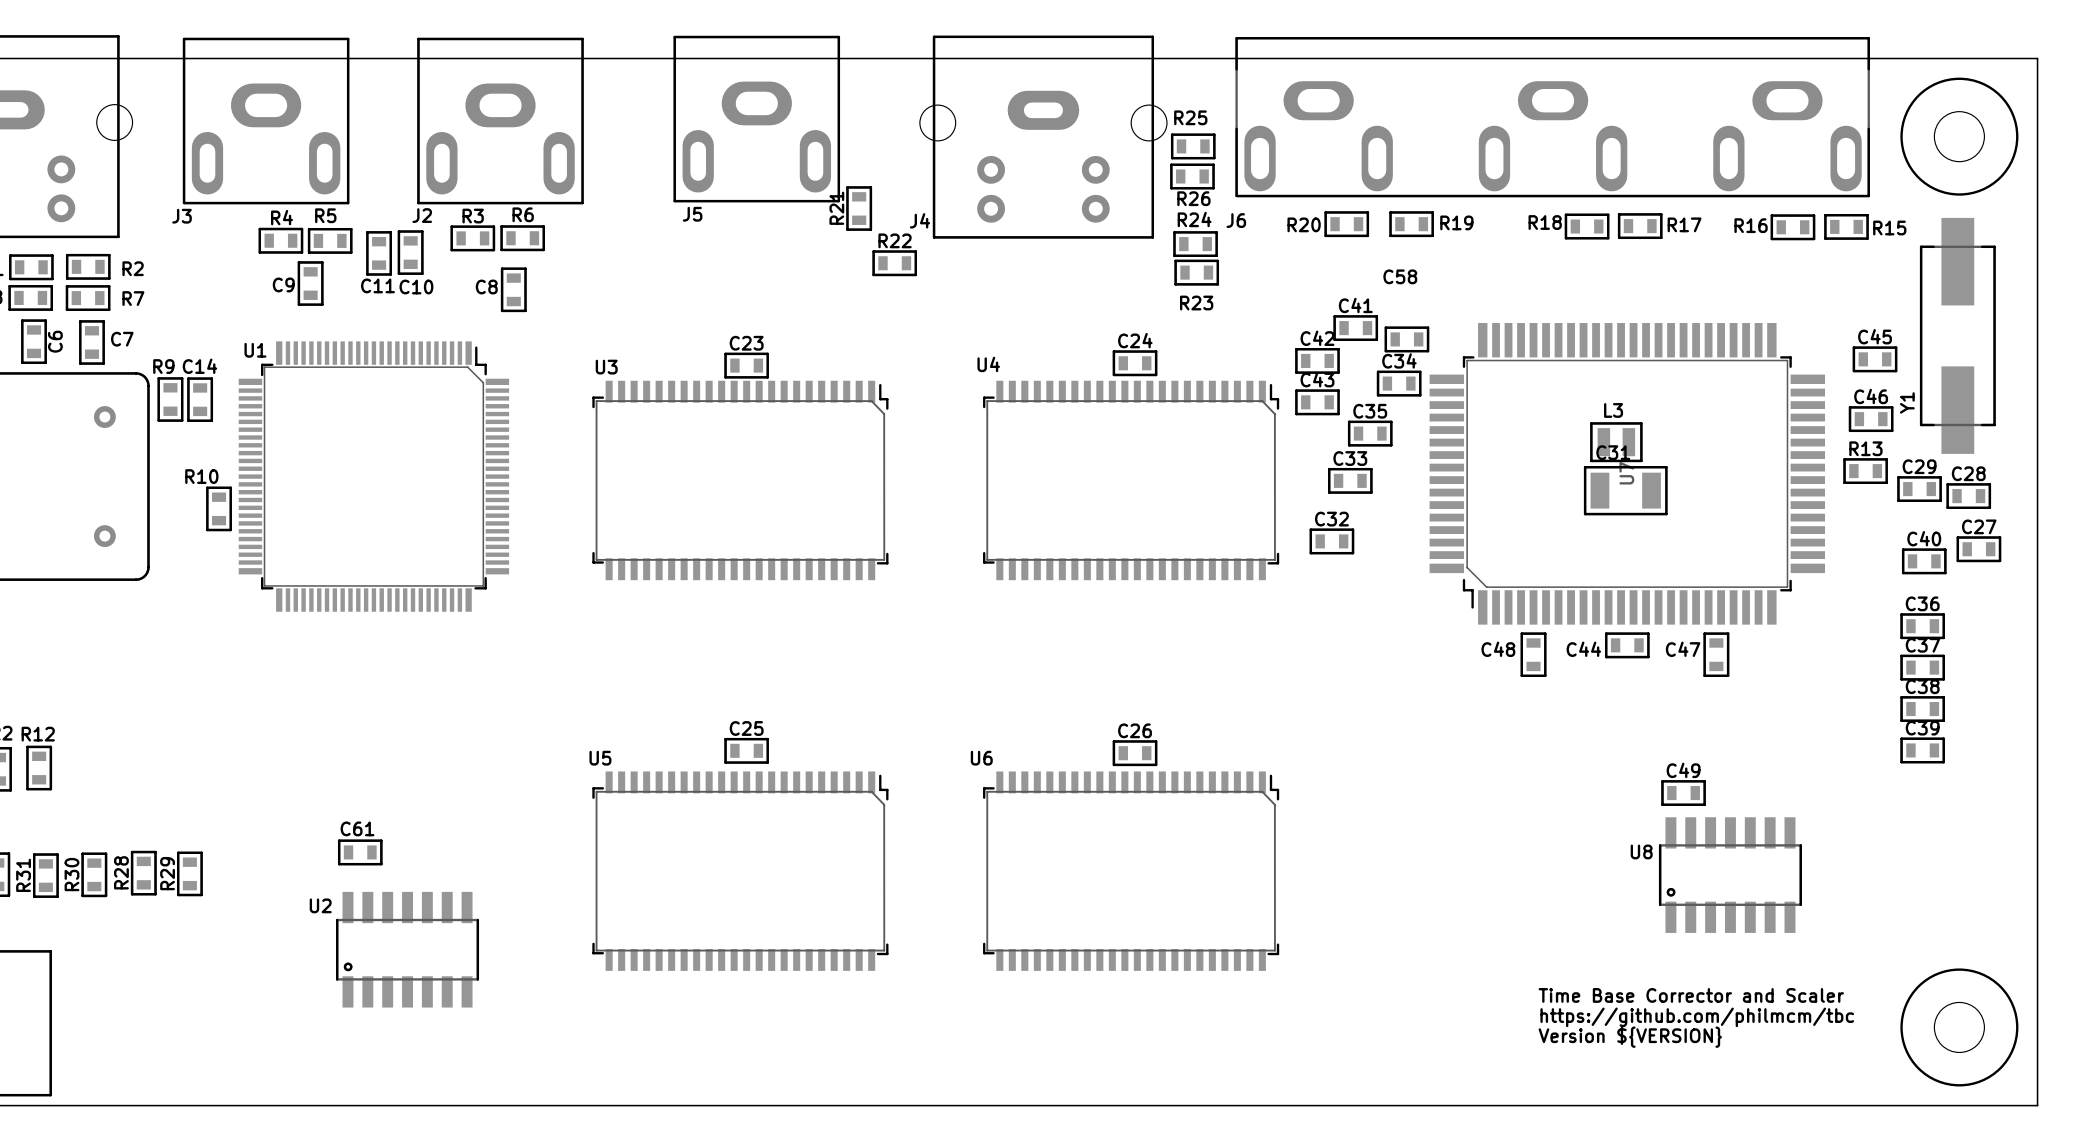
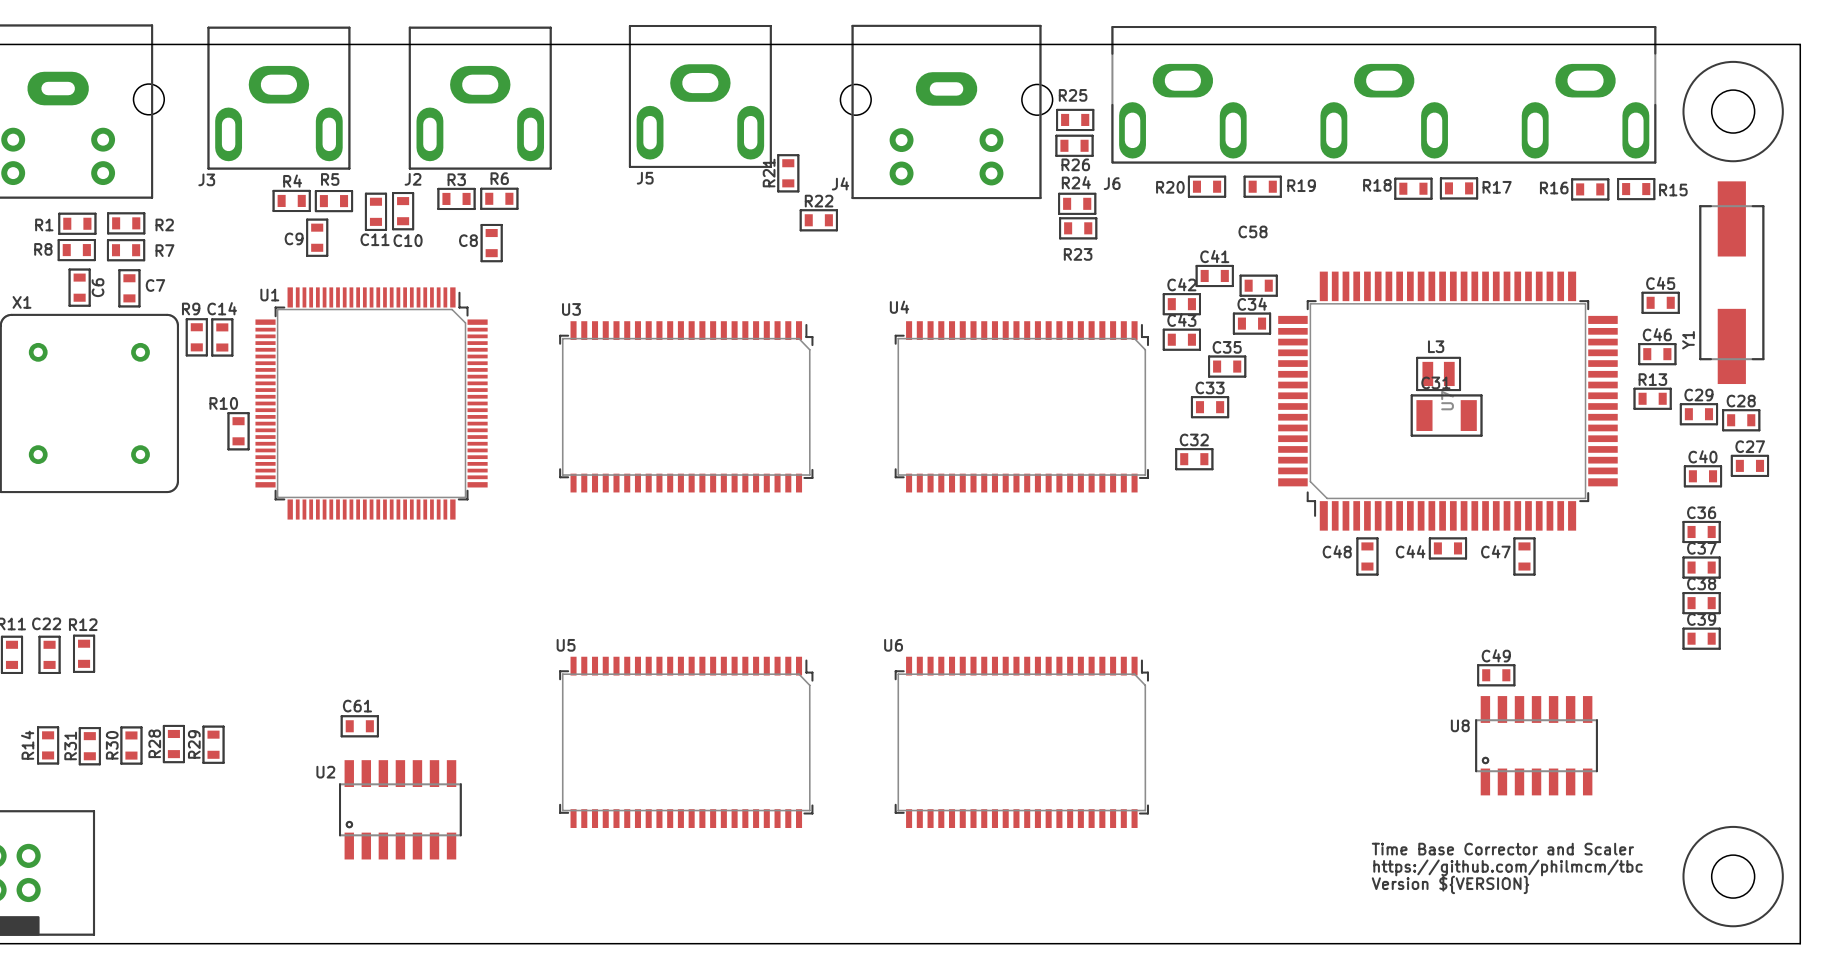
C24: (1135, 363) -> none
C23: (746, 365) -> none
C25: (746, 750) -> none
C26: (1135, 753) -> none

